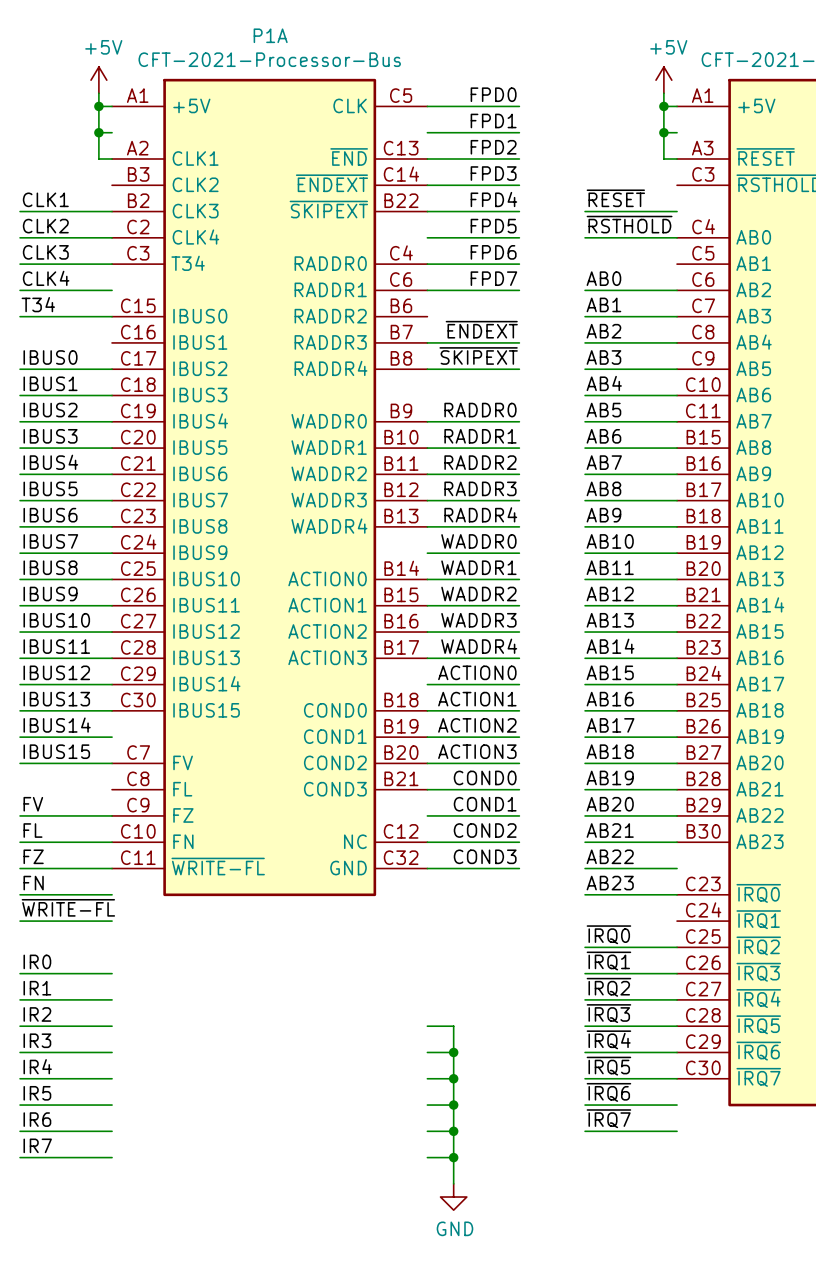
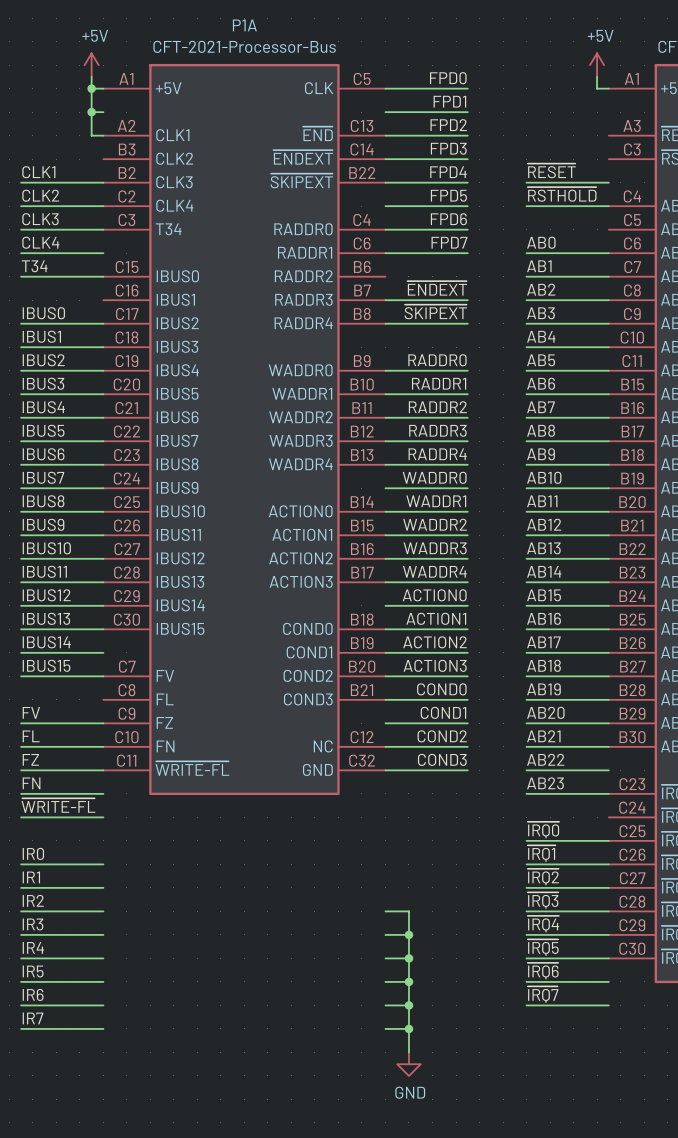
wire: (663, 106) (663, 158) (677, 158) -> none
junction: (663, 106) -> none
wire: (663, 132) (677, 132) -> none
junction: (663, 132) -> none

